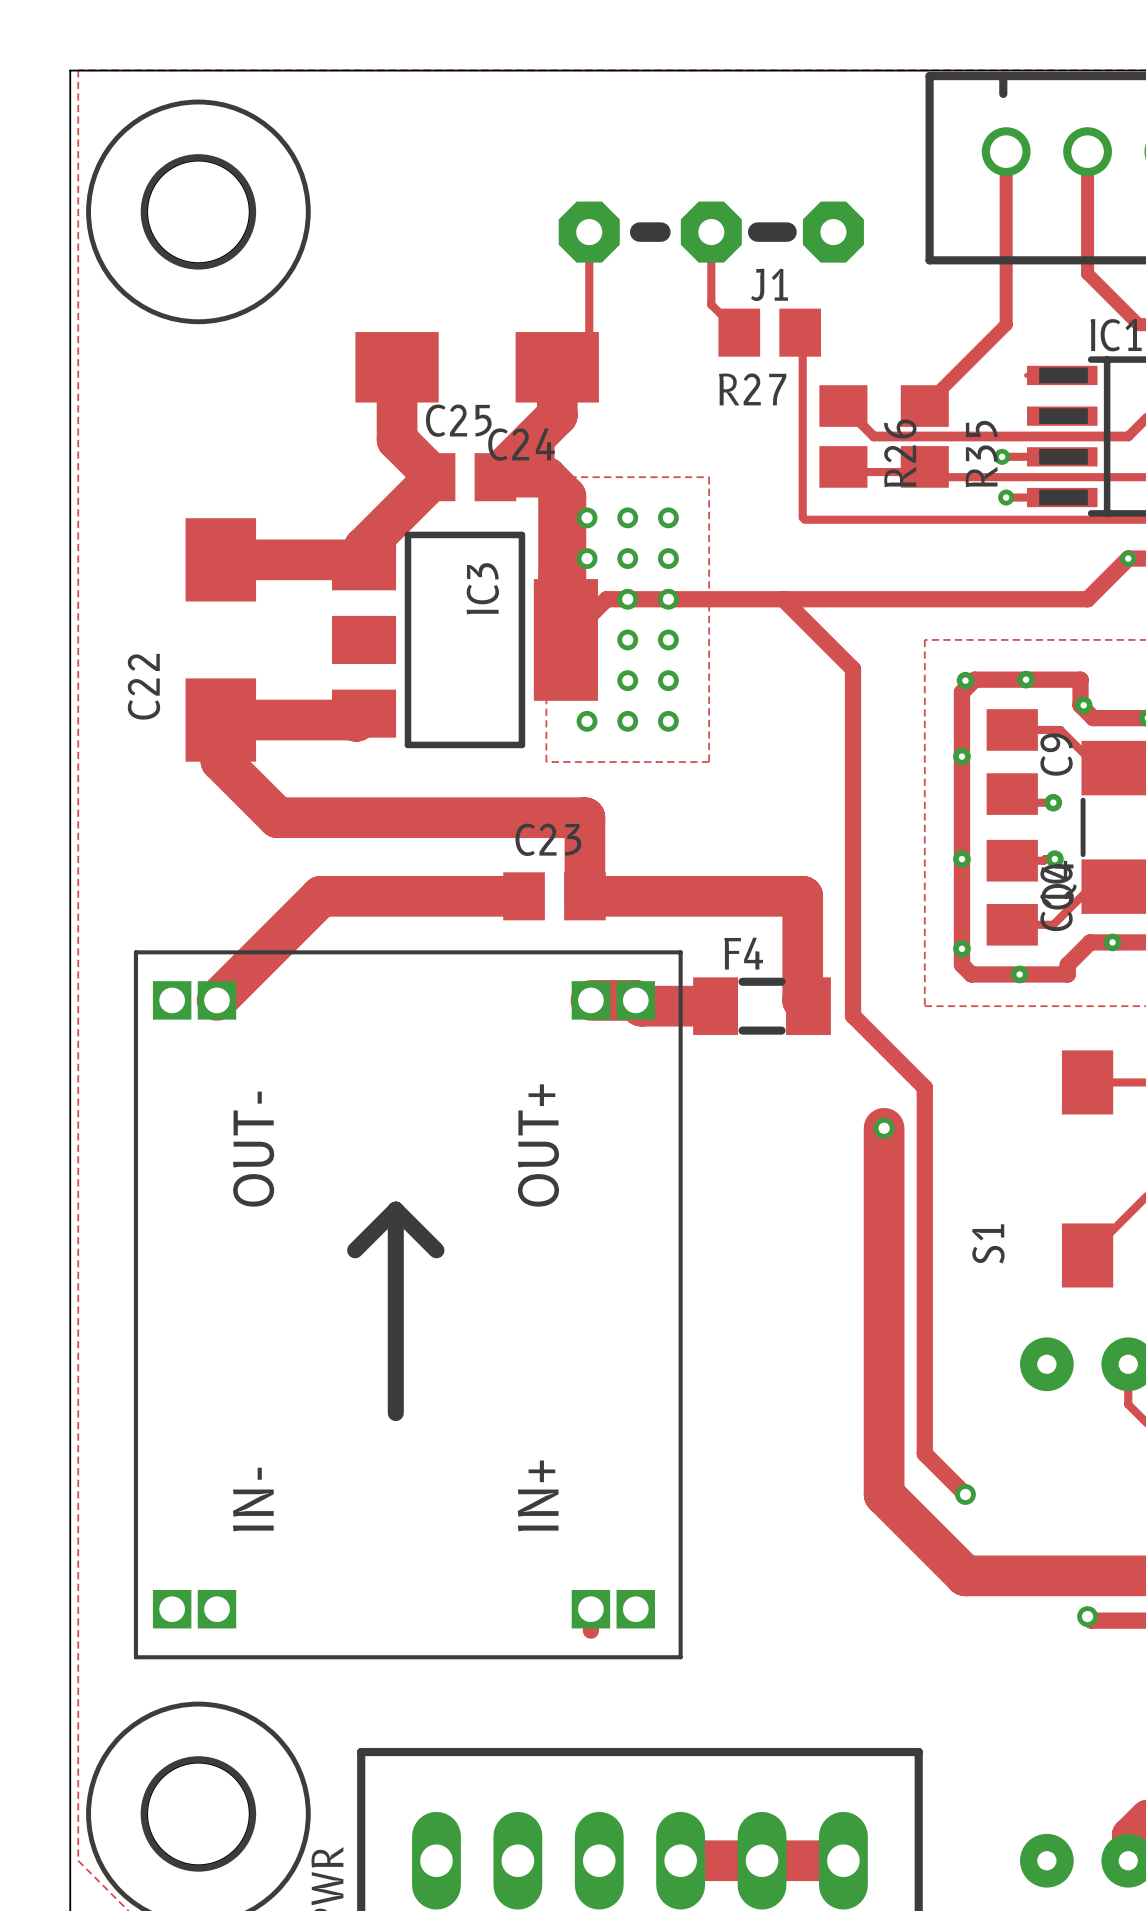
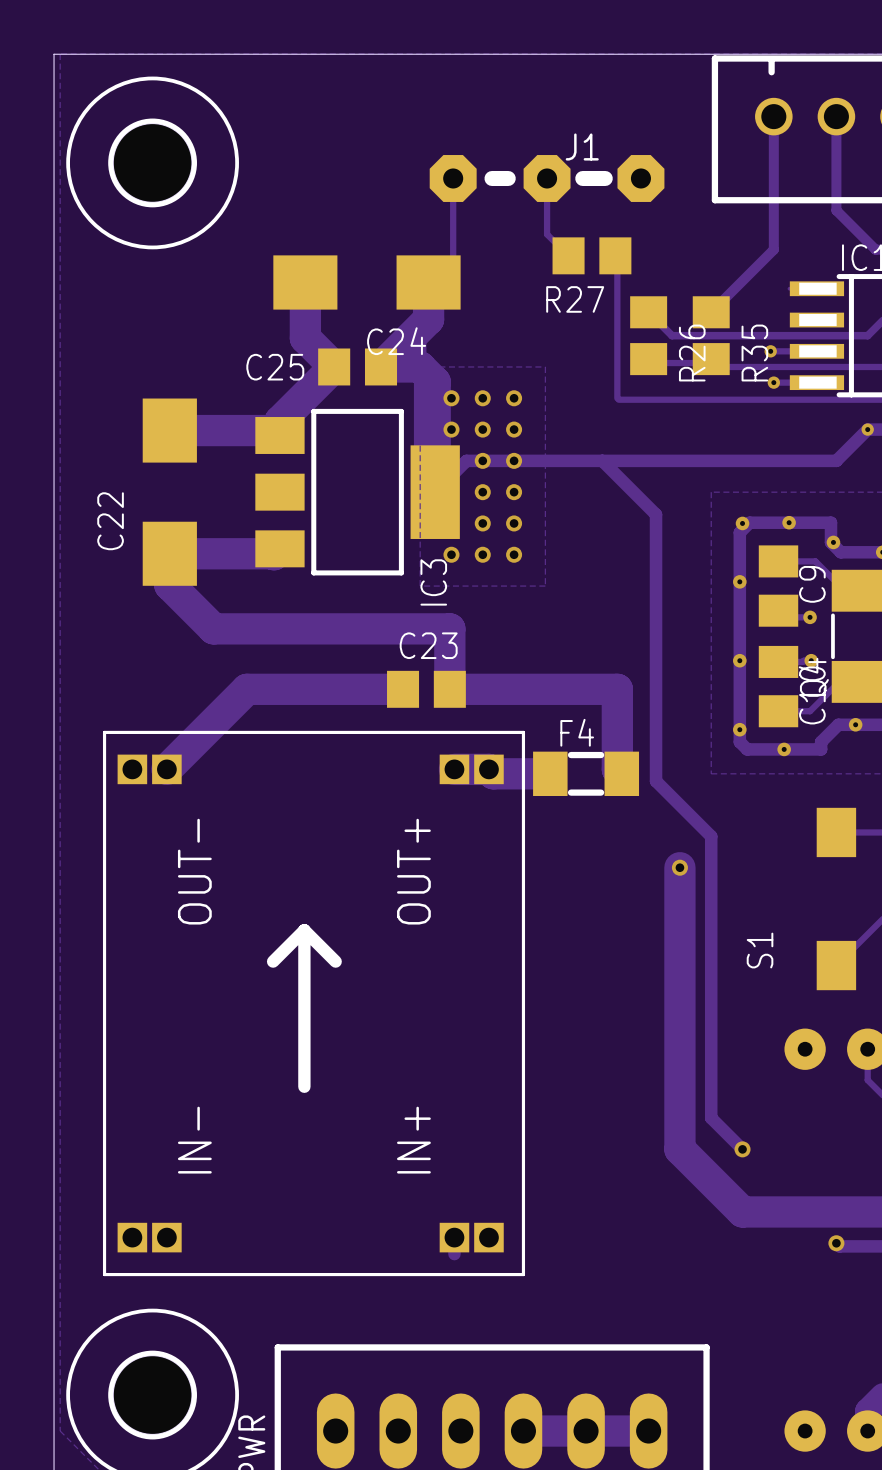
J1 name position: J1 (769, 284) -> J1 (582, 147)
C25 name position: C25 (458, 420) -> C25 (275, 367)
IC3 name position: IC3 (482, 588) -> IC3 (433, 582)

